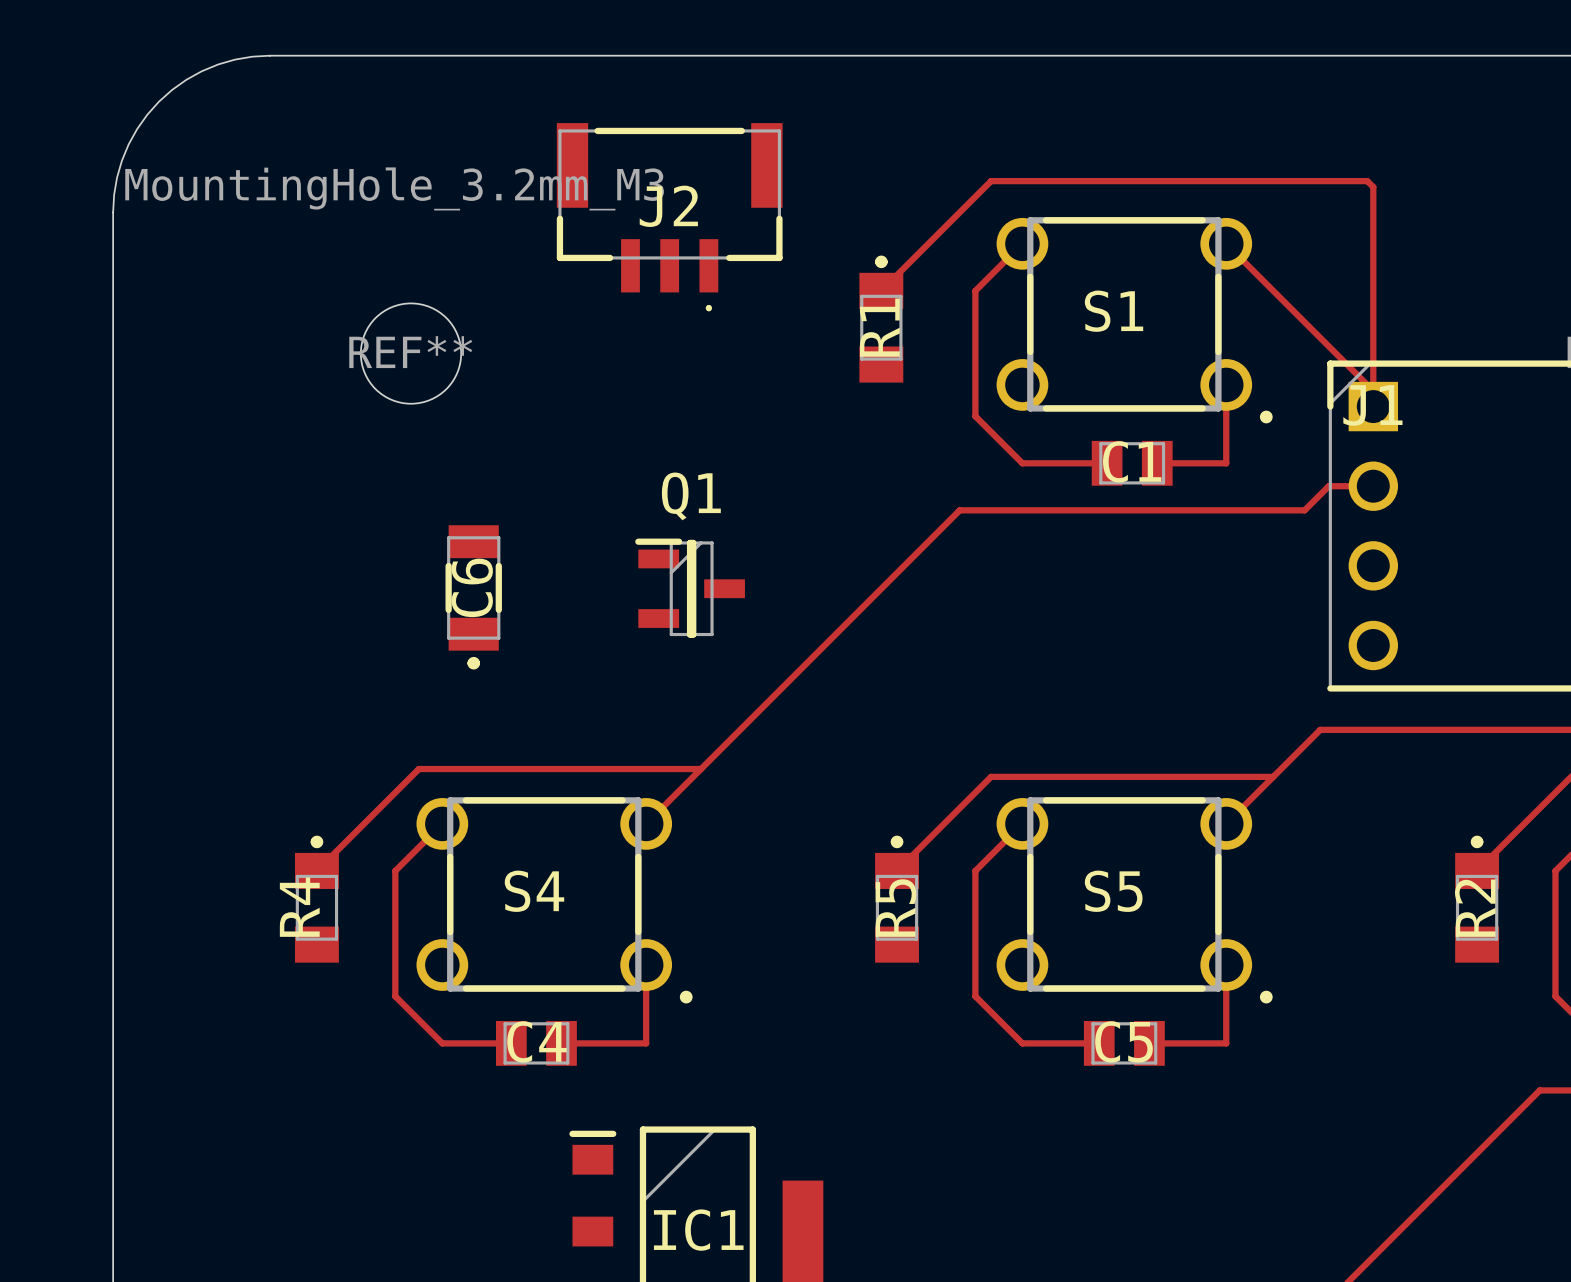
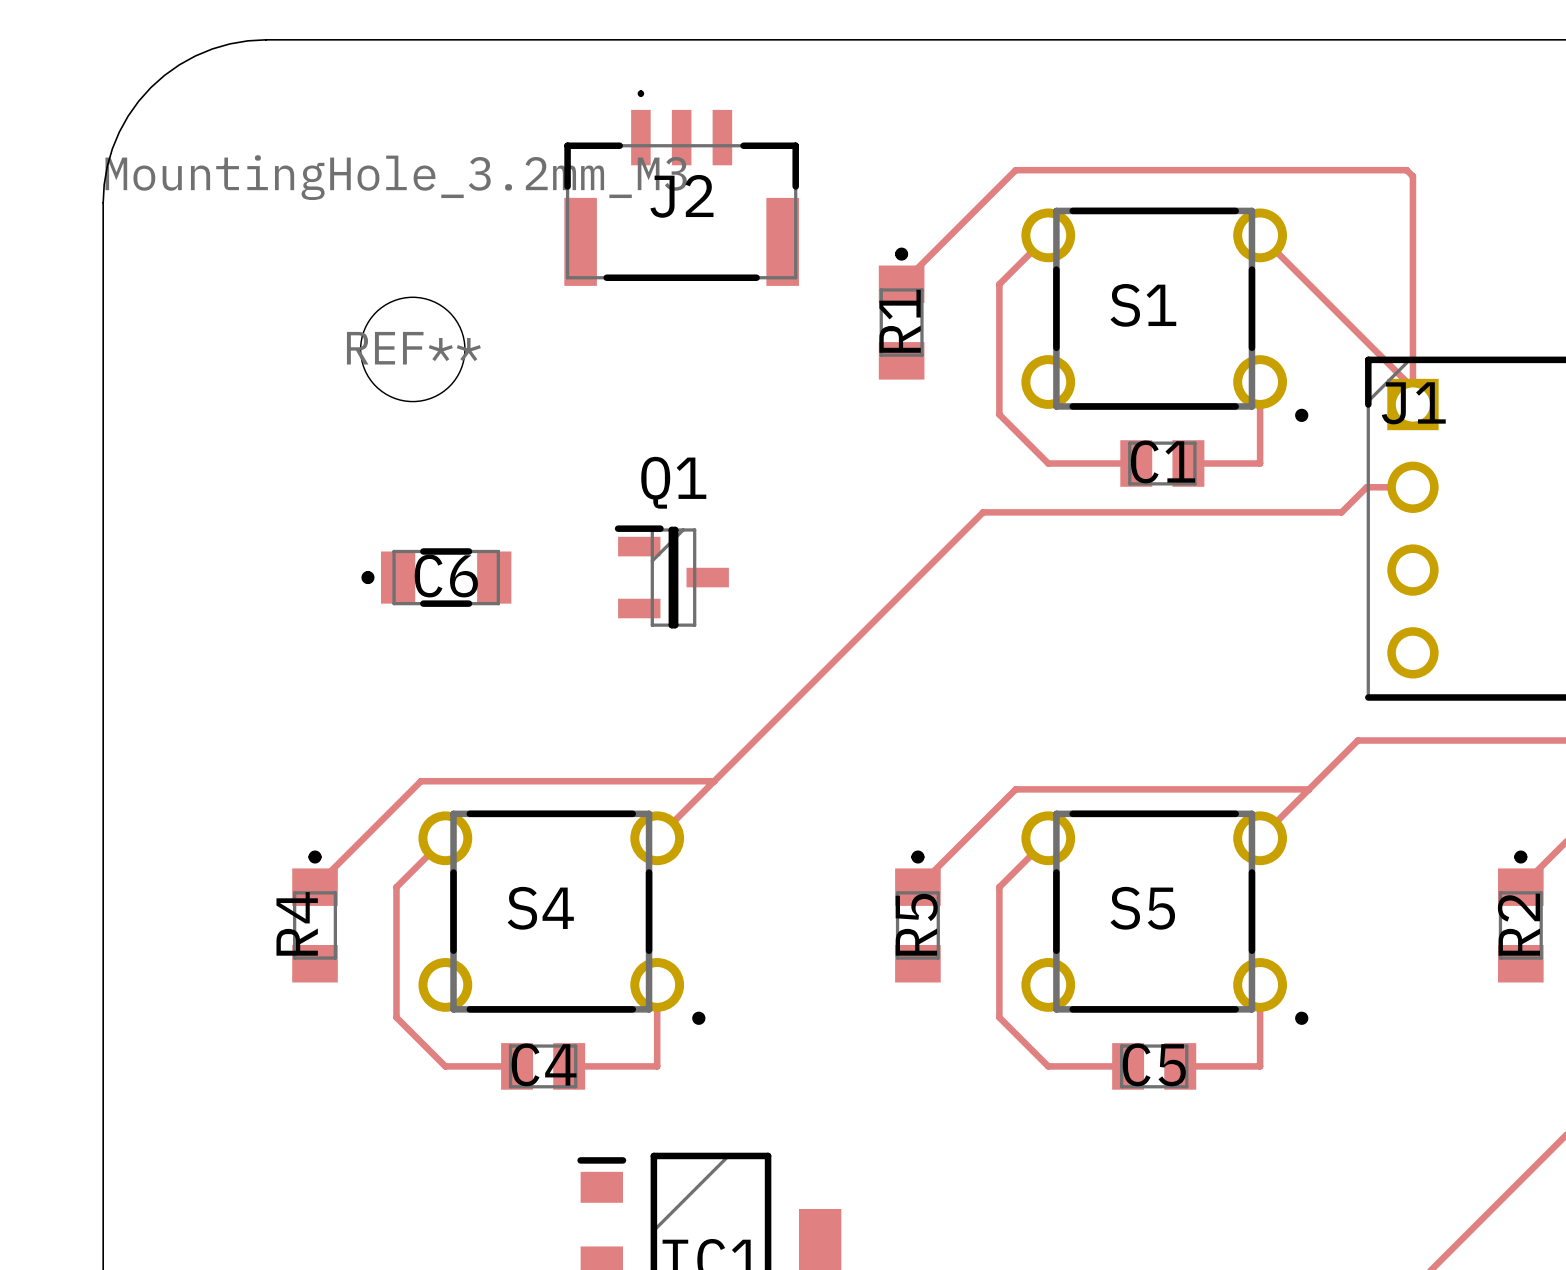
J2 rotation: 0° (669, 217) -> 180° (681, 188)
Q1 position: (690, 588) -> (671, 576)
C6 rotation: 0° (473, 597) -> 90° clockwise (436, 577)

